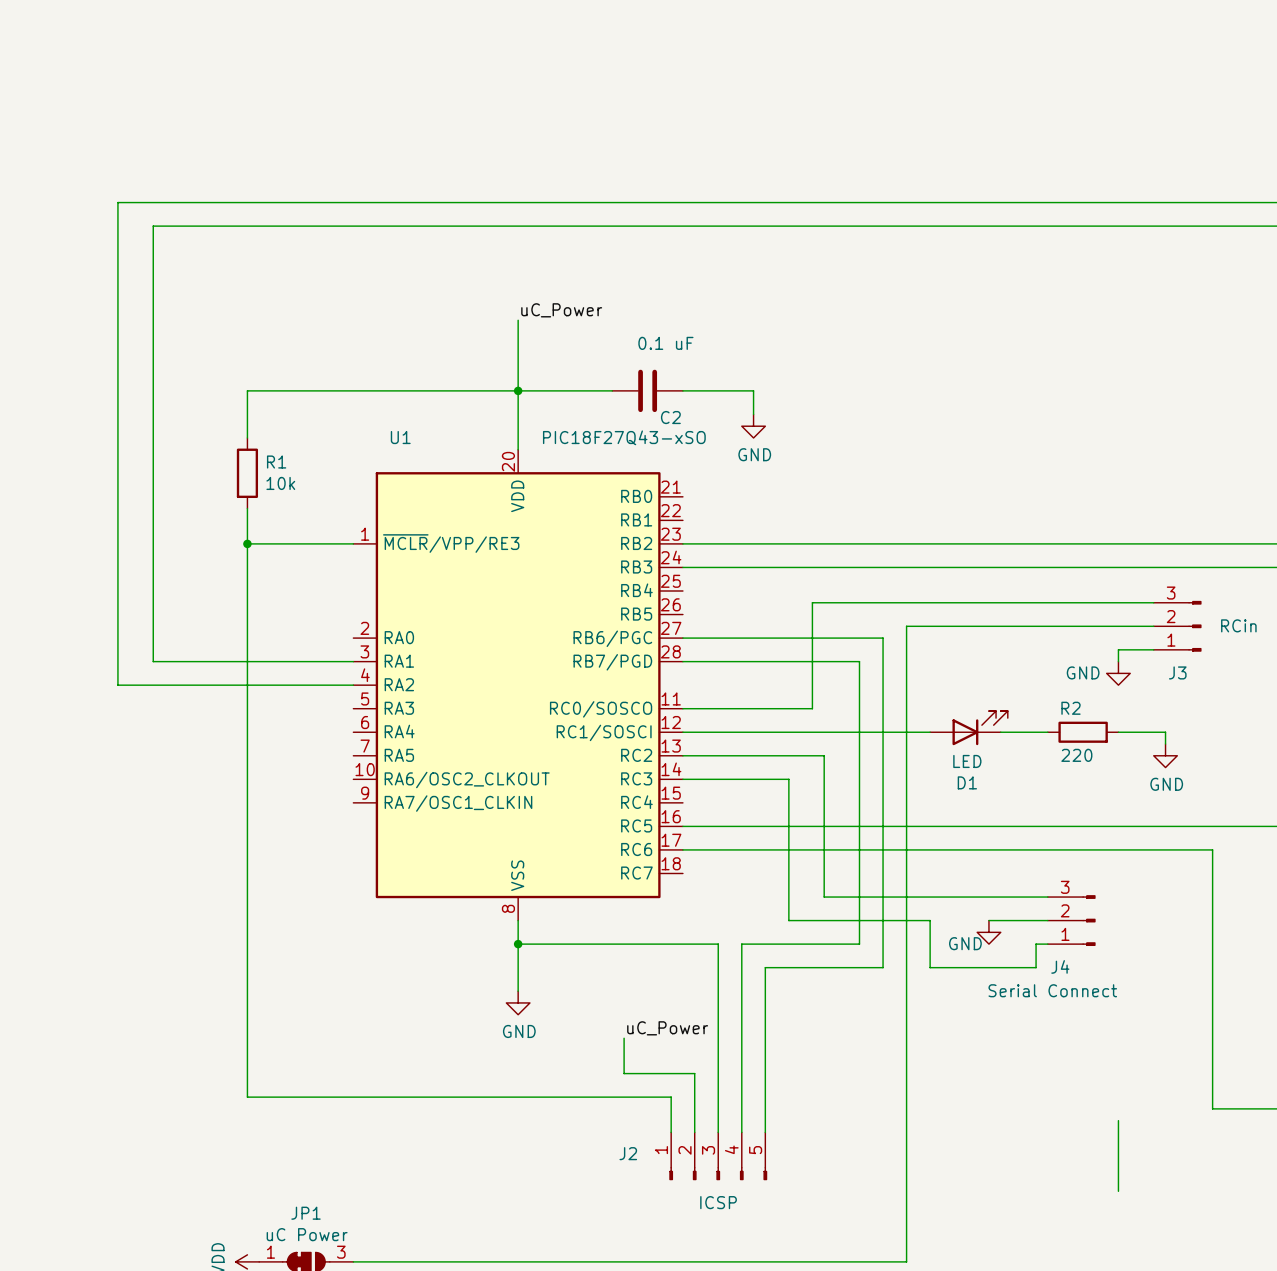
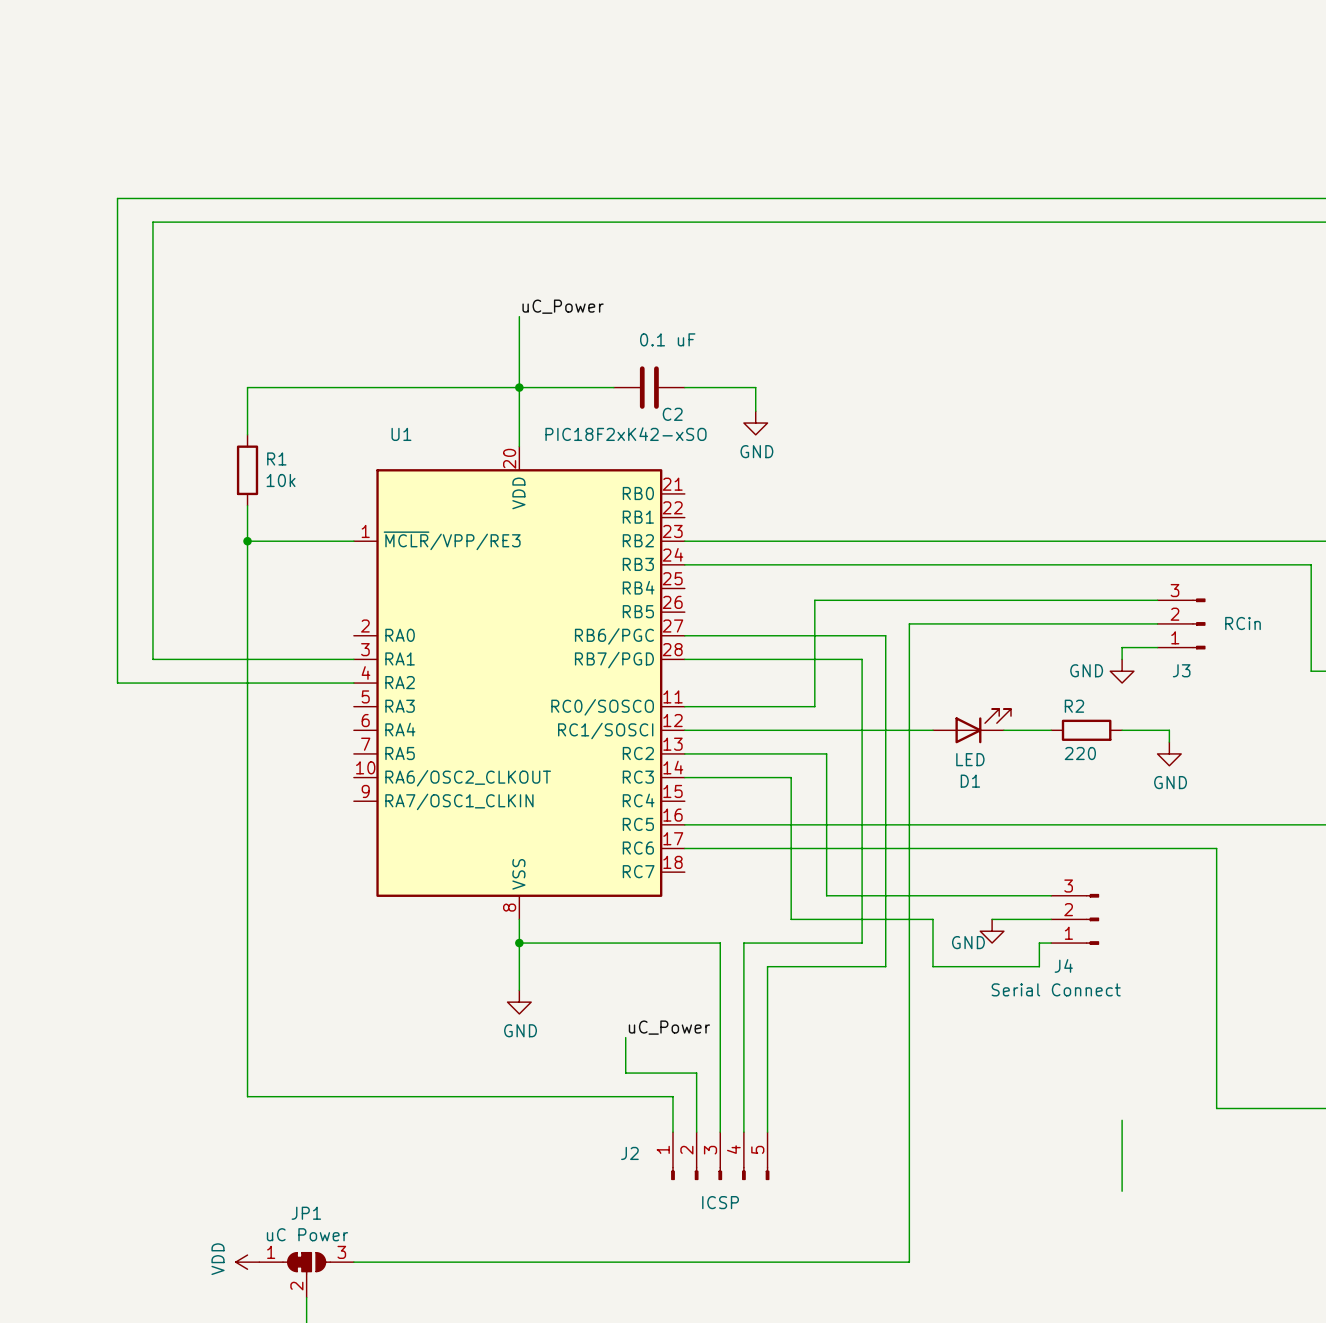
U1 value: PIC18F27Q43-xSO (624, 437) -> PIC18F2xK42-xSO (626, 434)

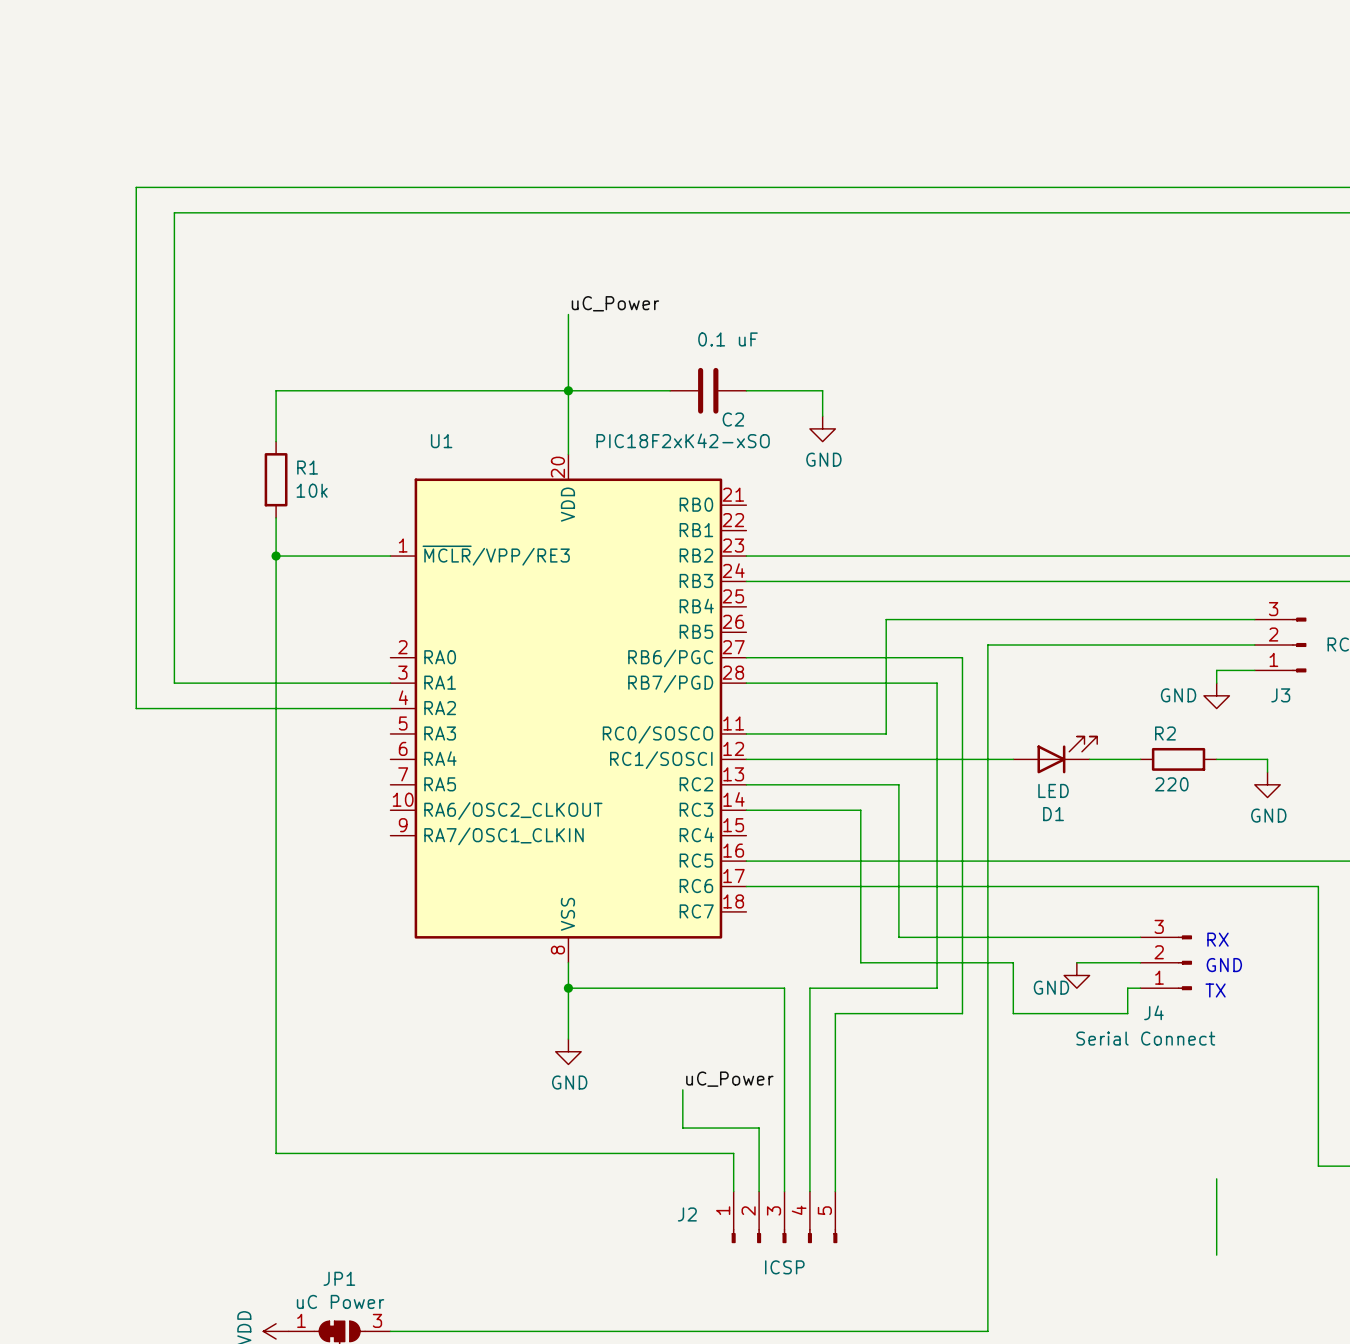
text: none -> RX (1217, 939)
text: none -> GND (1224, 965)
text: none -> TX (1215, 990)

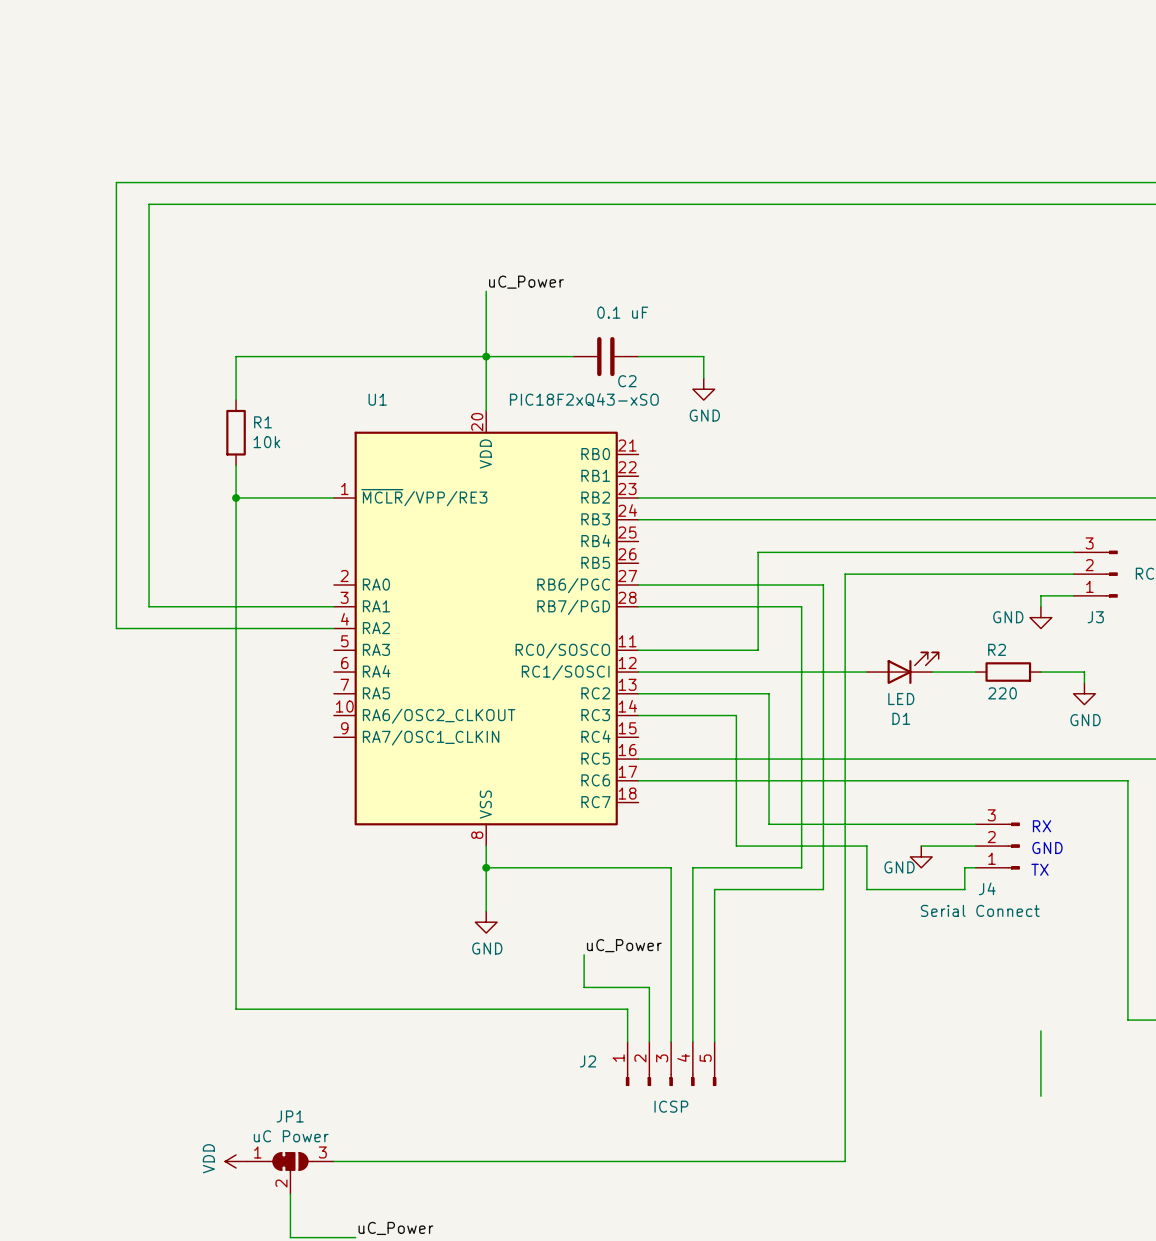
U1 value: PIC18F2xK42-xSO (683, 440) -> PIC18F2xQ43-xSO (584, 399)

